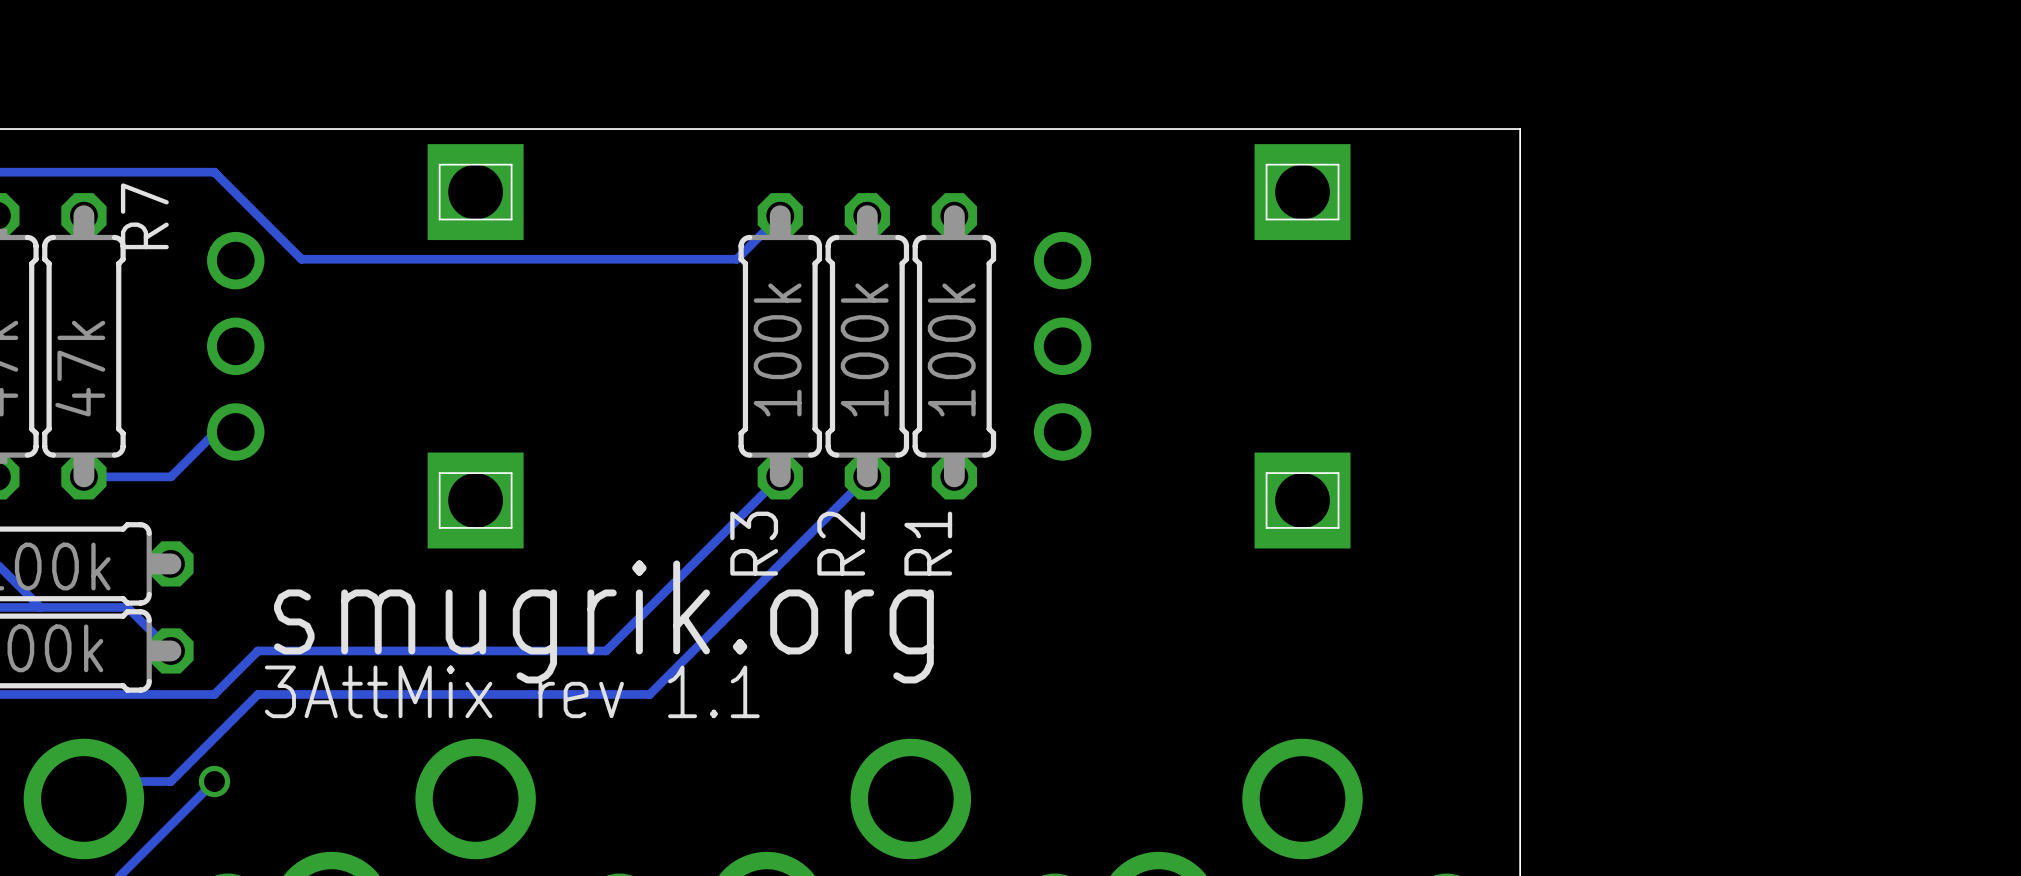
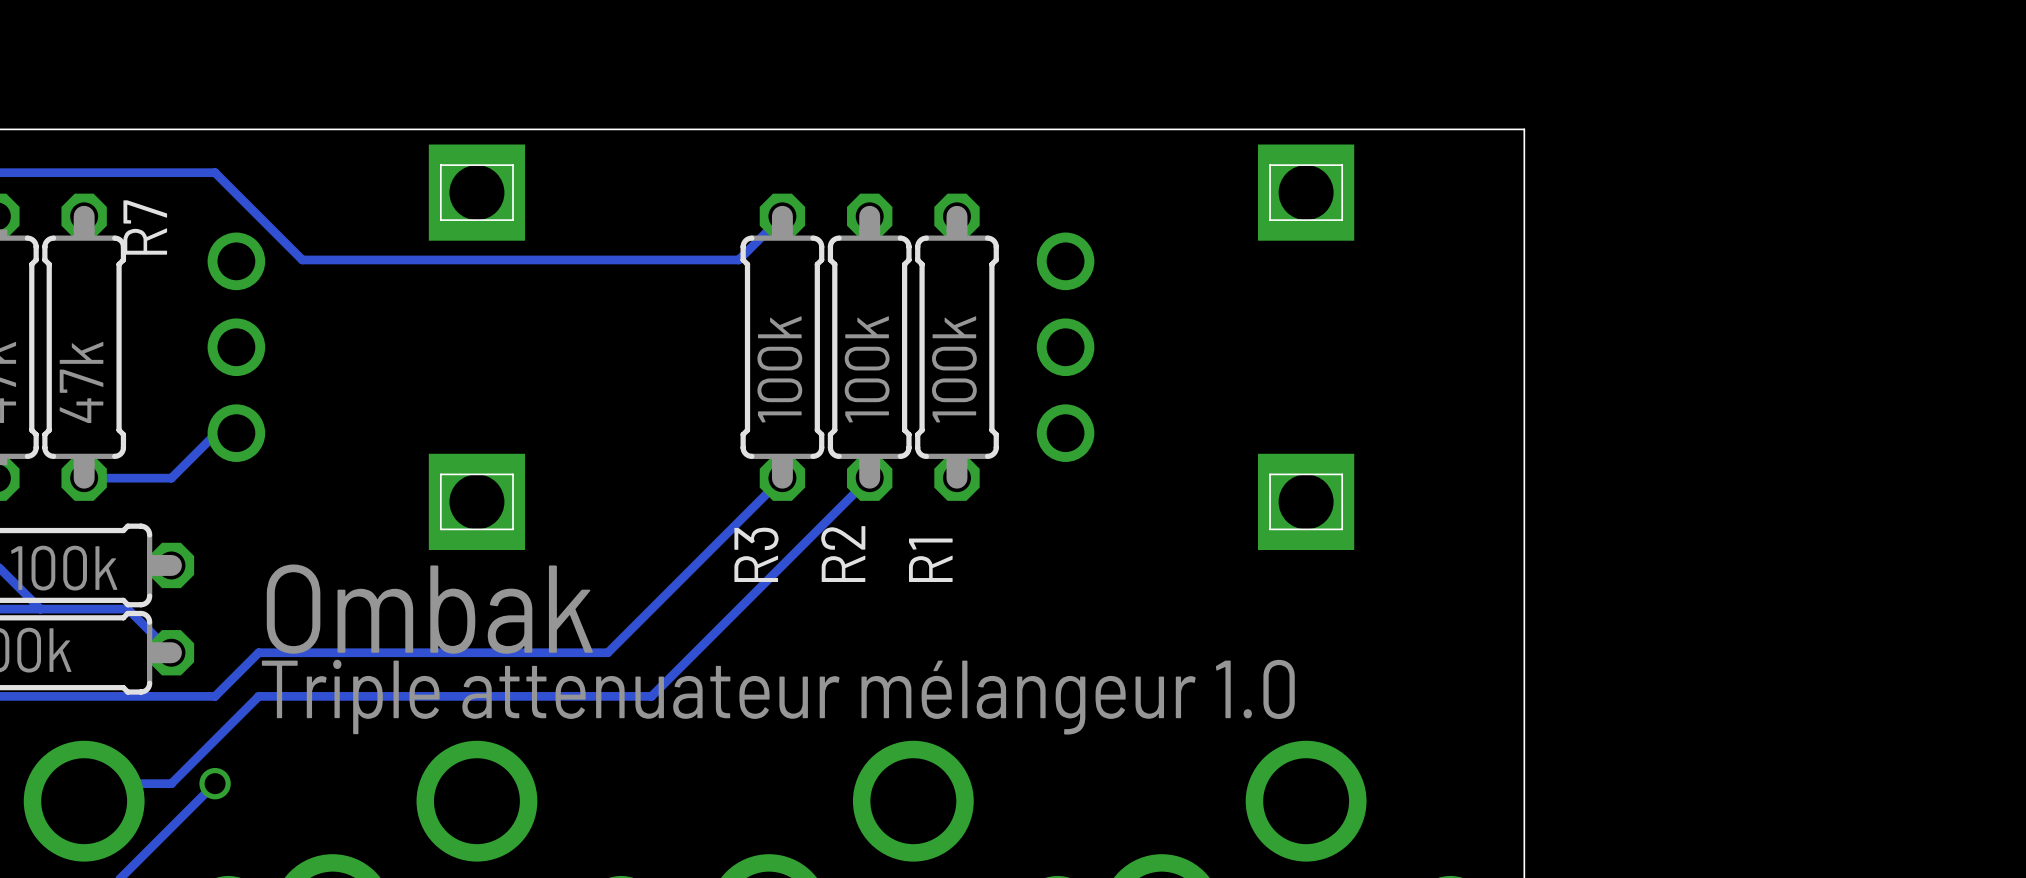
text: smugrik.org (603, 621) -> Ombak (429, 609)
text: 3AttMix rev 1.1 (512, 691) -> Triple attenuateur mélangeur 1.0 (778, 697)

